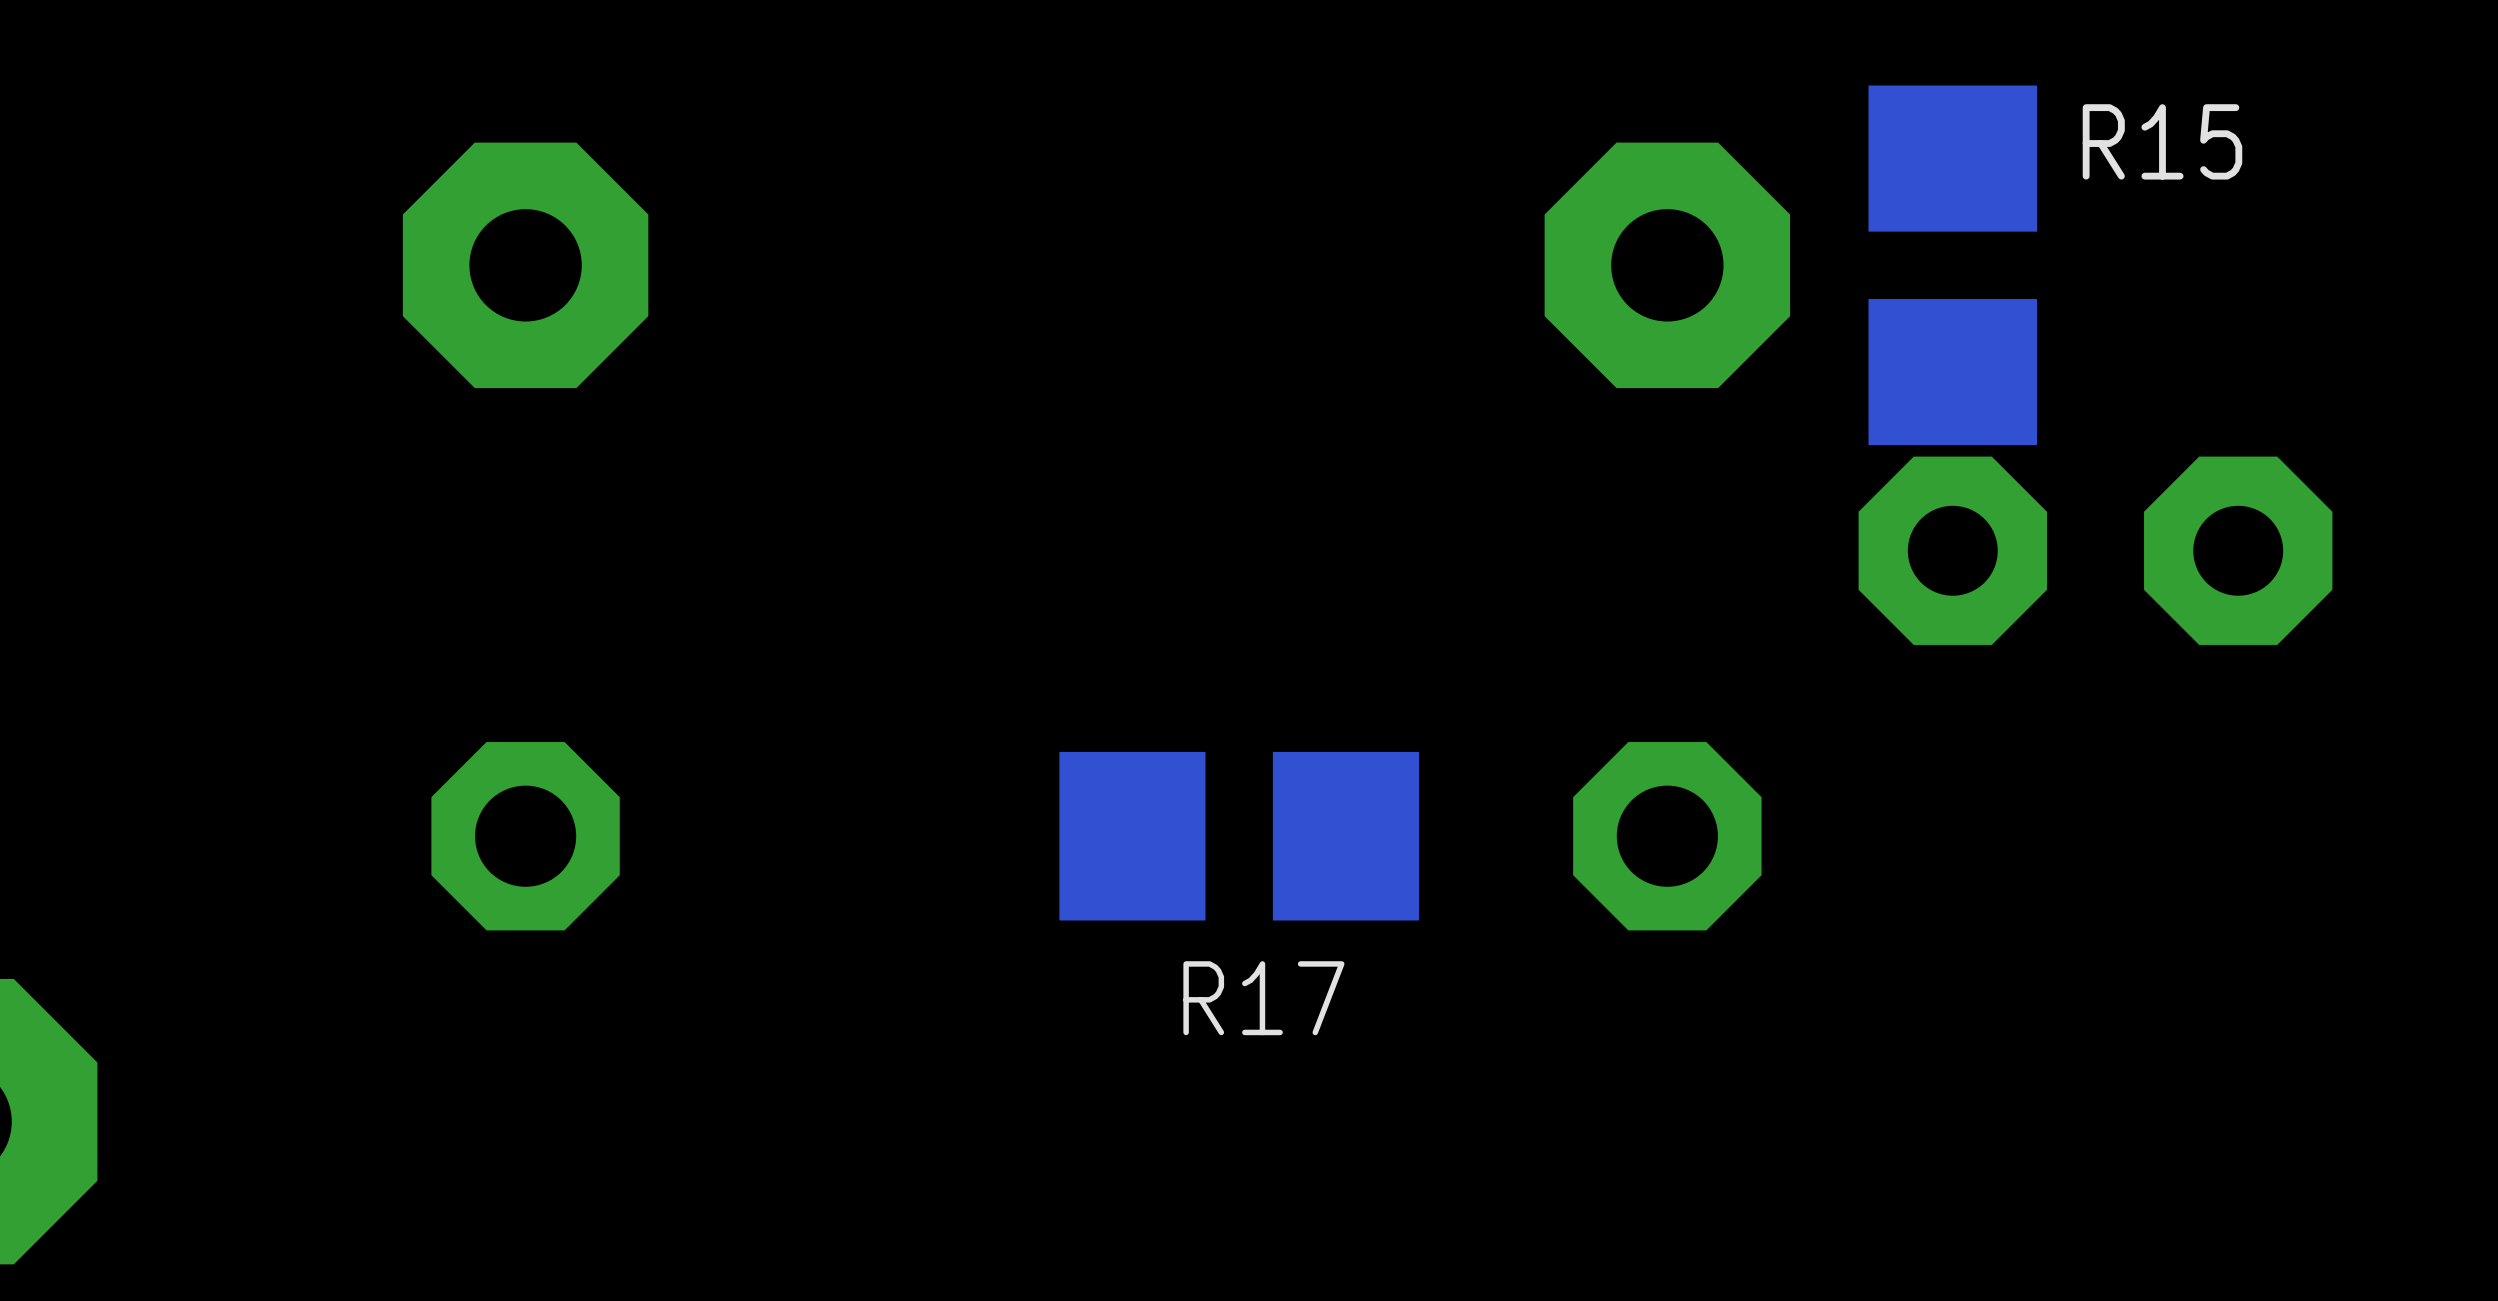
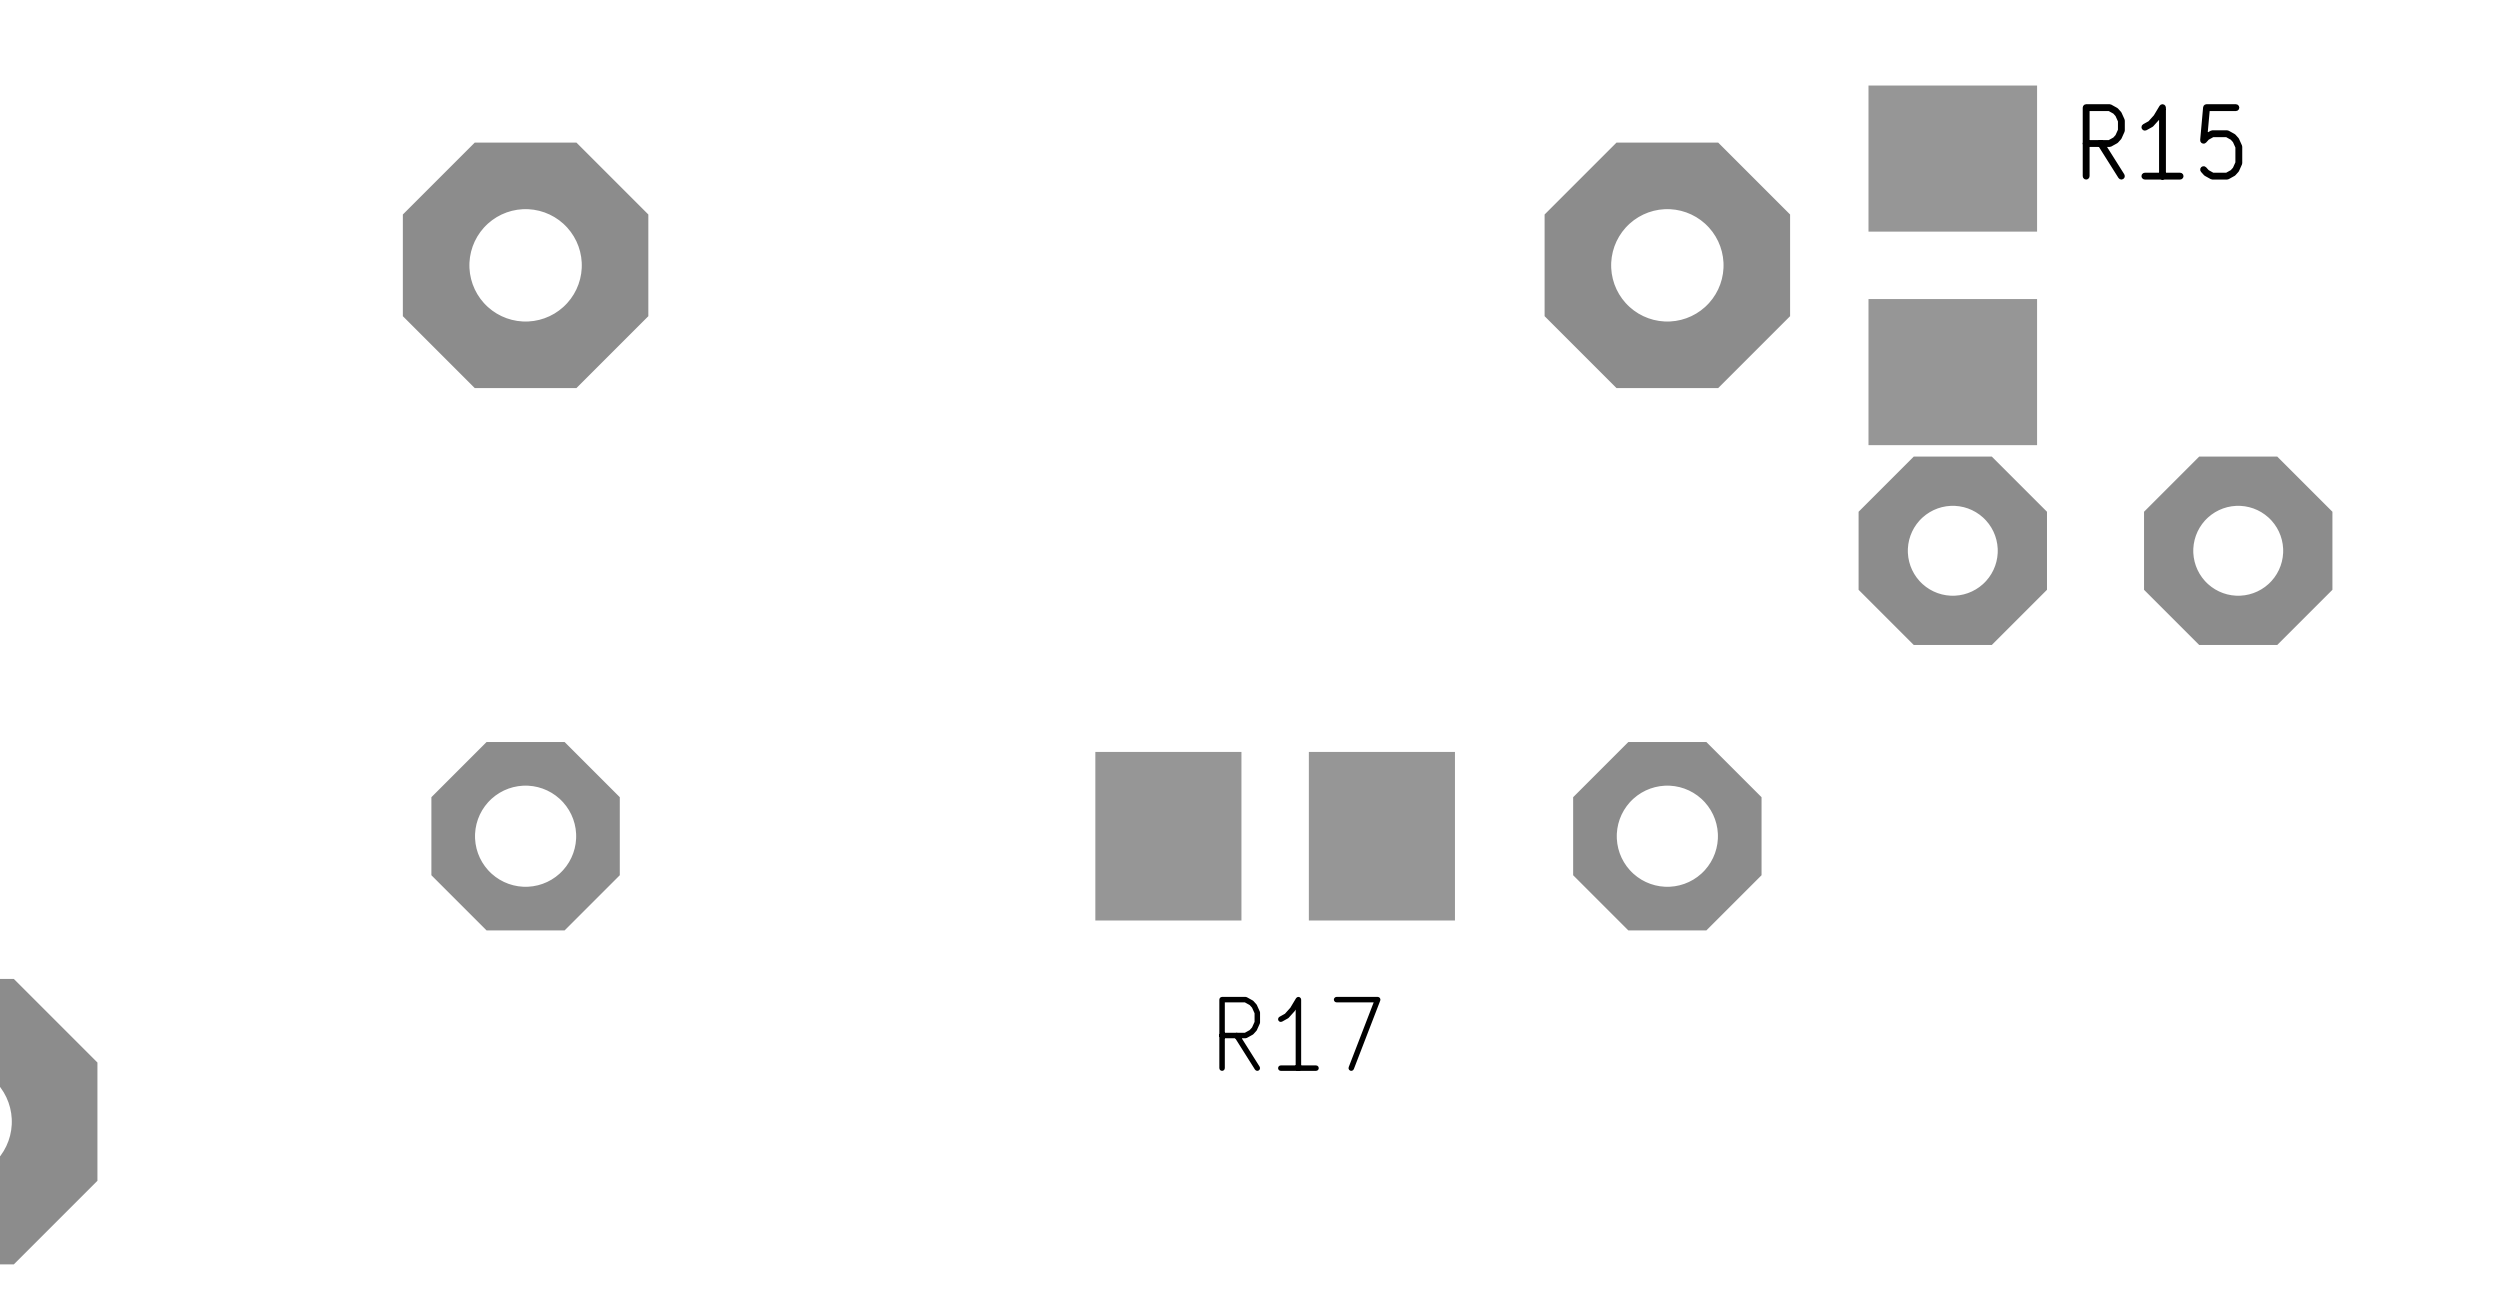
R17 position: (1239, 836) -> (1275, 836)
R17 name position: R17 (1263, 998) -> R17 (1299, 1033)

